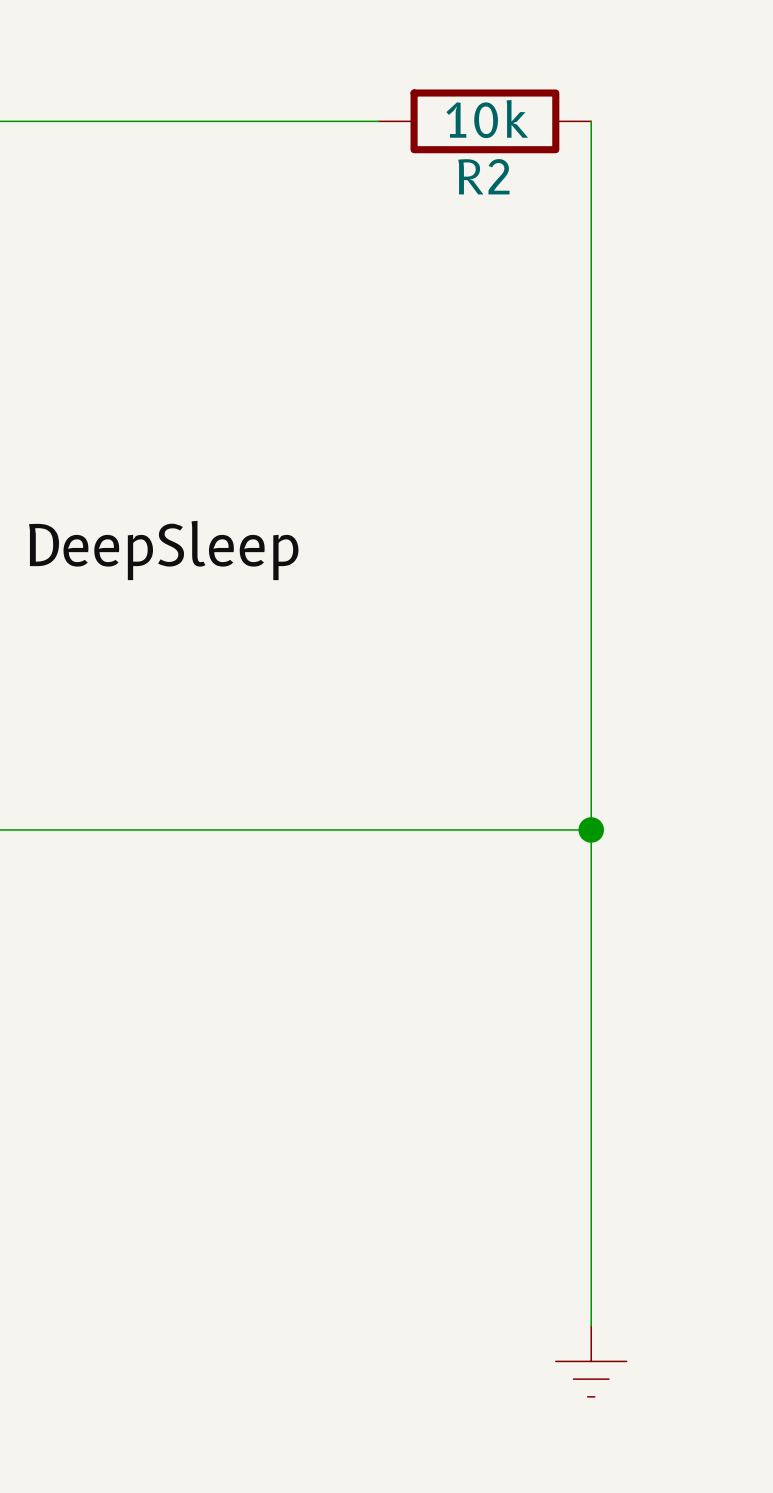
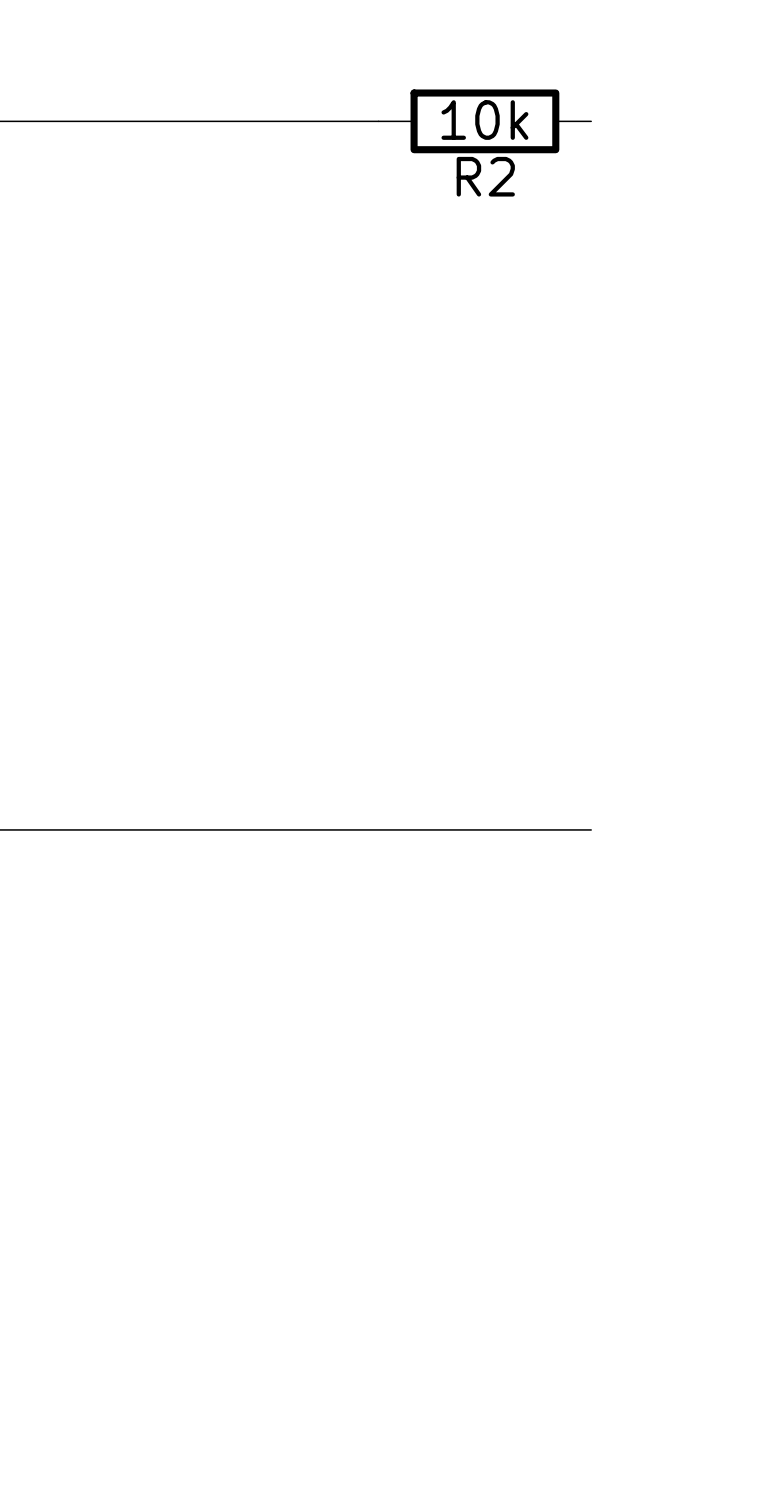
wire: (591, 121) (591, 1325) -> none
label: DeepSleep (163, 550) -> none
junction: (591, 829) -> none
power symbol: (591, 1361) -> none

